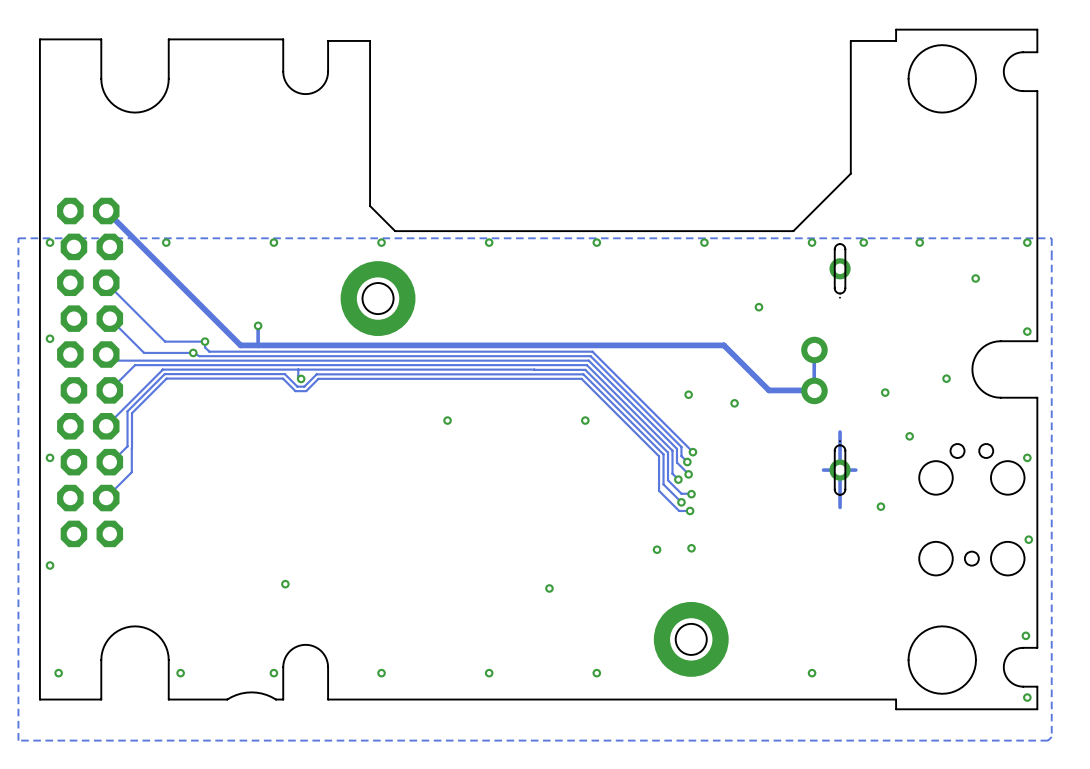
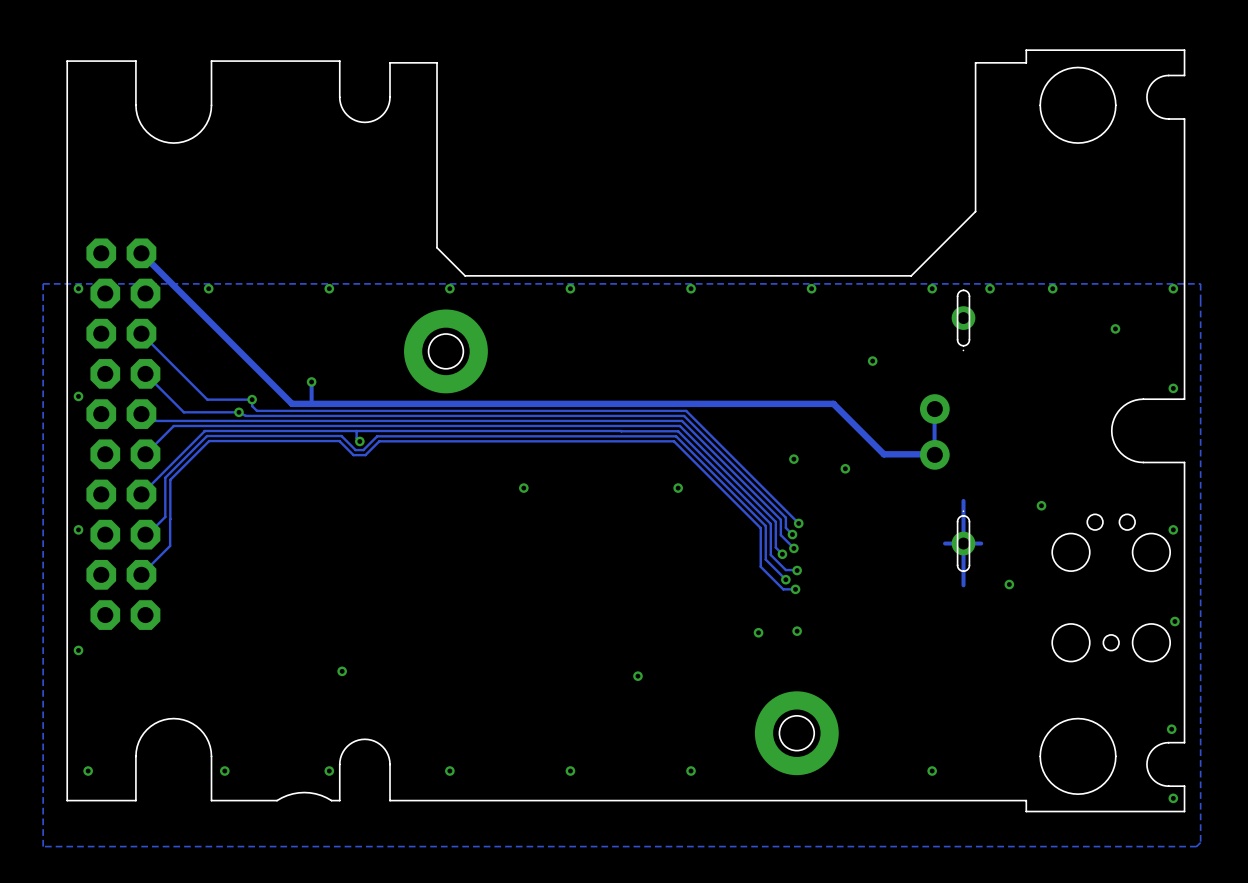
via: (946, 378) -> none
via: (885, 392) -> none

